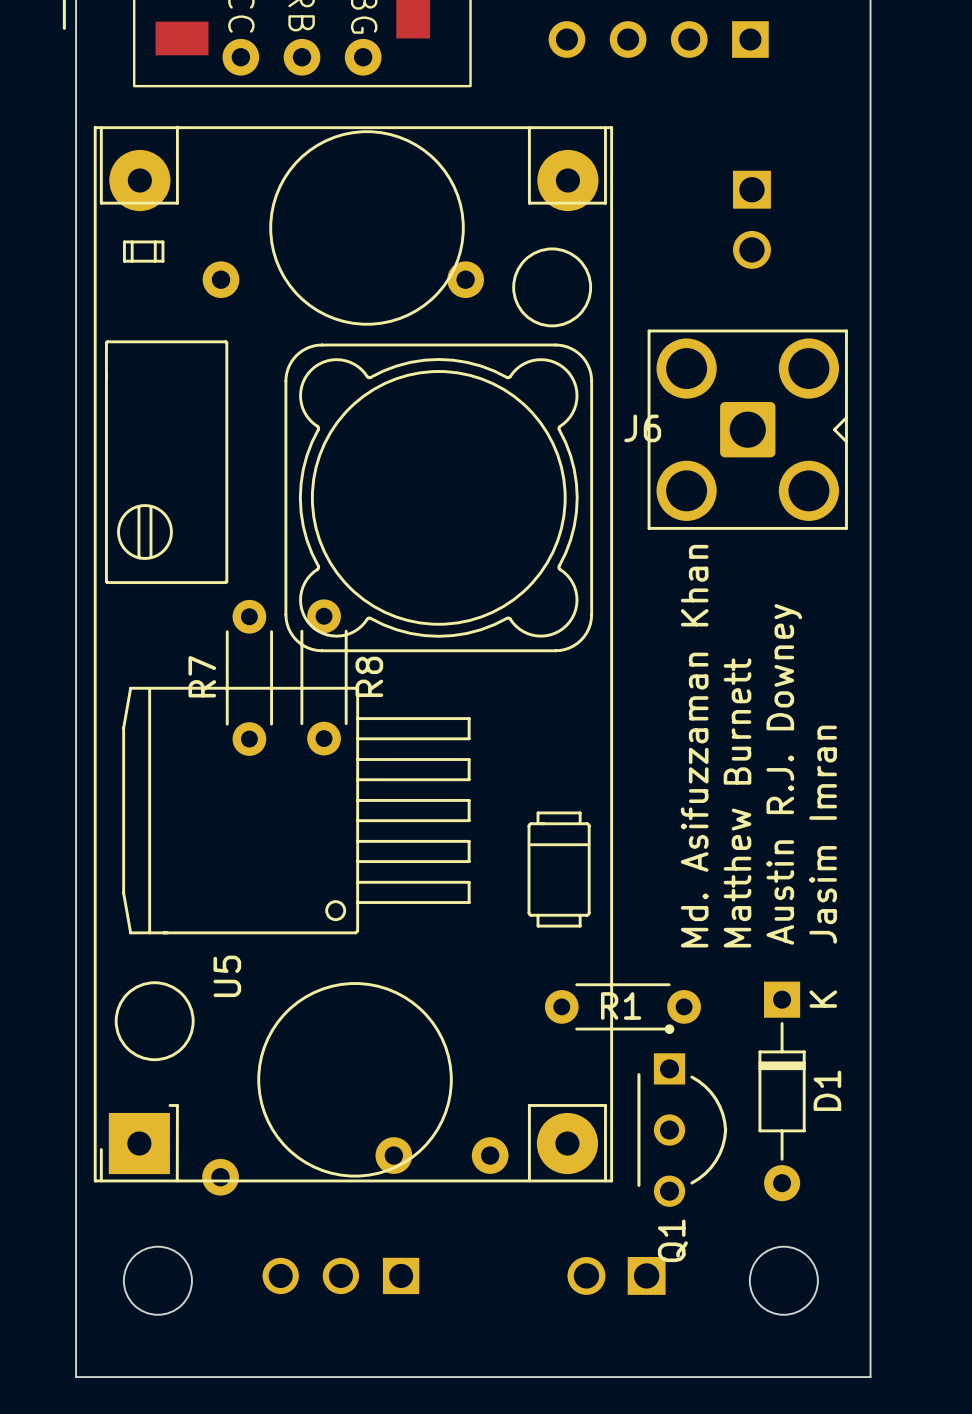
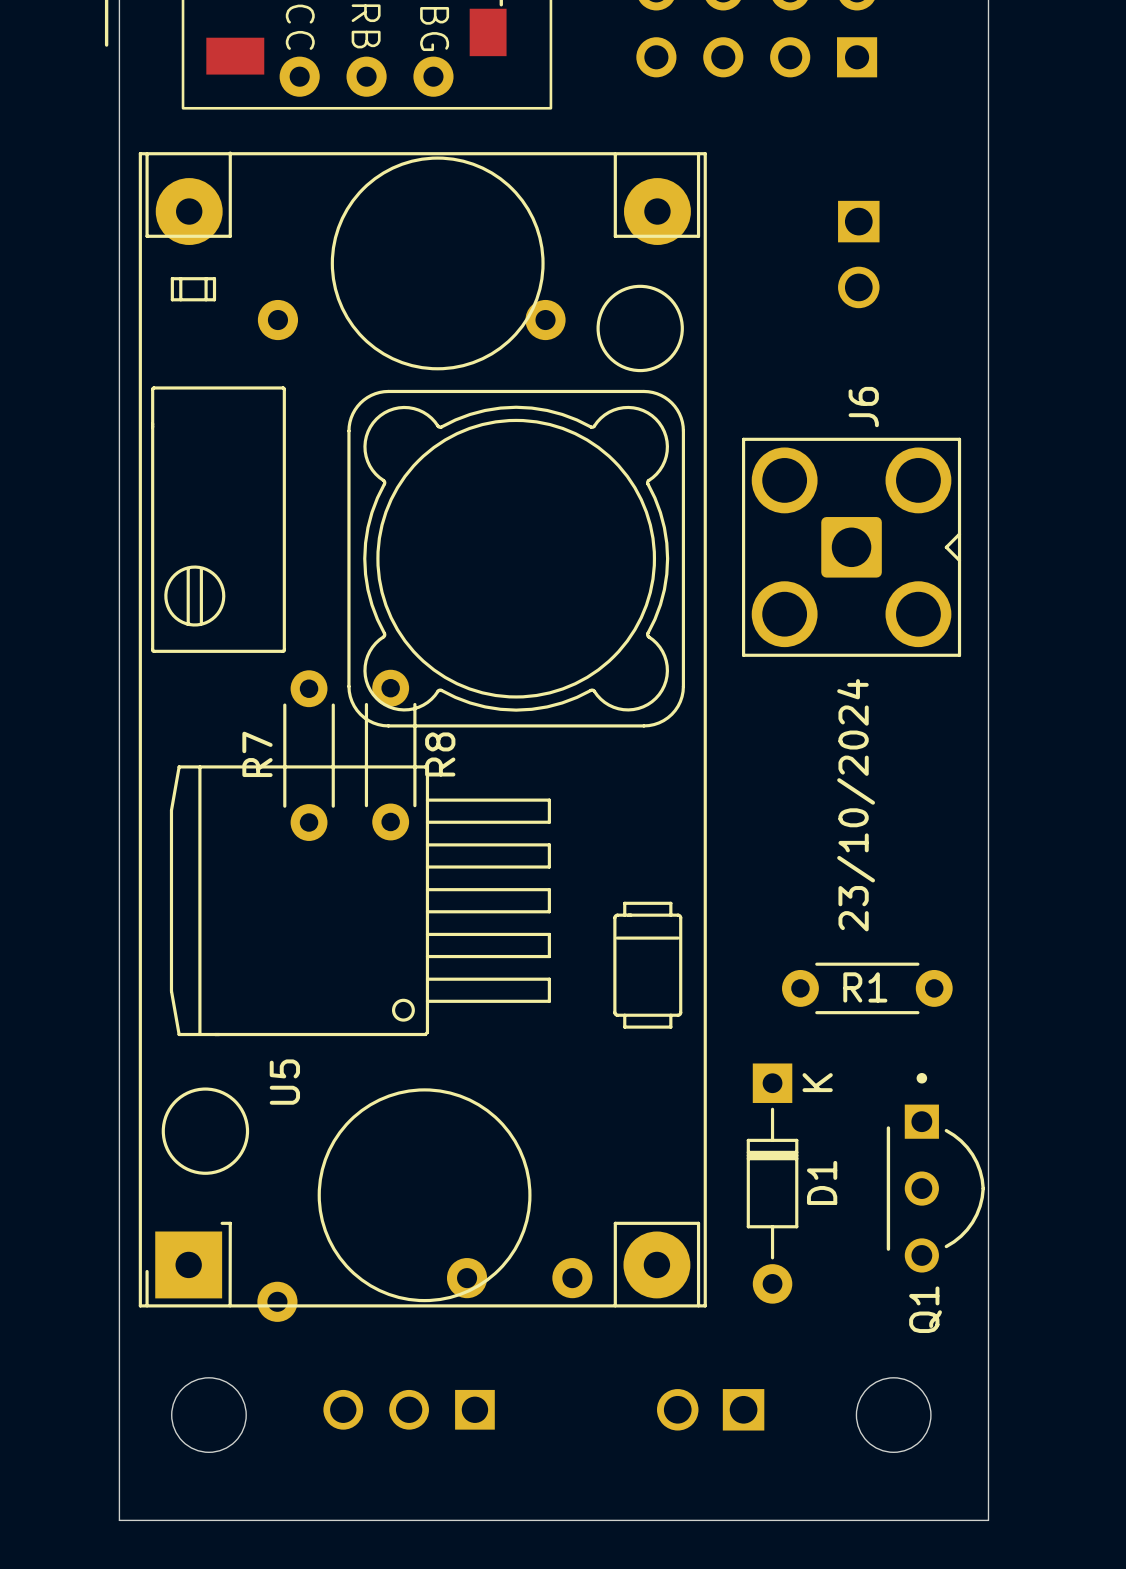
J6 name rotation: 0° (642, 428) -> 90° counterclockwise (863, 407)
J6 name position: J6 (642, 428) -> J6 (863, 407)
J6 position: (747, 429) -> (851, 547)
text: none -> 23/10/2024 (856, 805)
text: Md. Asifuzzaman Khan (694, 746) -> none
text: Austin R.J. Downey (784, 774) -> none
text: Matthew Burnett (737, 802) -> none
text: Jasim Imran (823, 834) -> none
R1 position: (622, 1006) -> (867, 988)
D1 position: (782, 1091) -> (772, 1183)
Q1 position: (682, 1115) -> (935, 1172)

